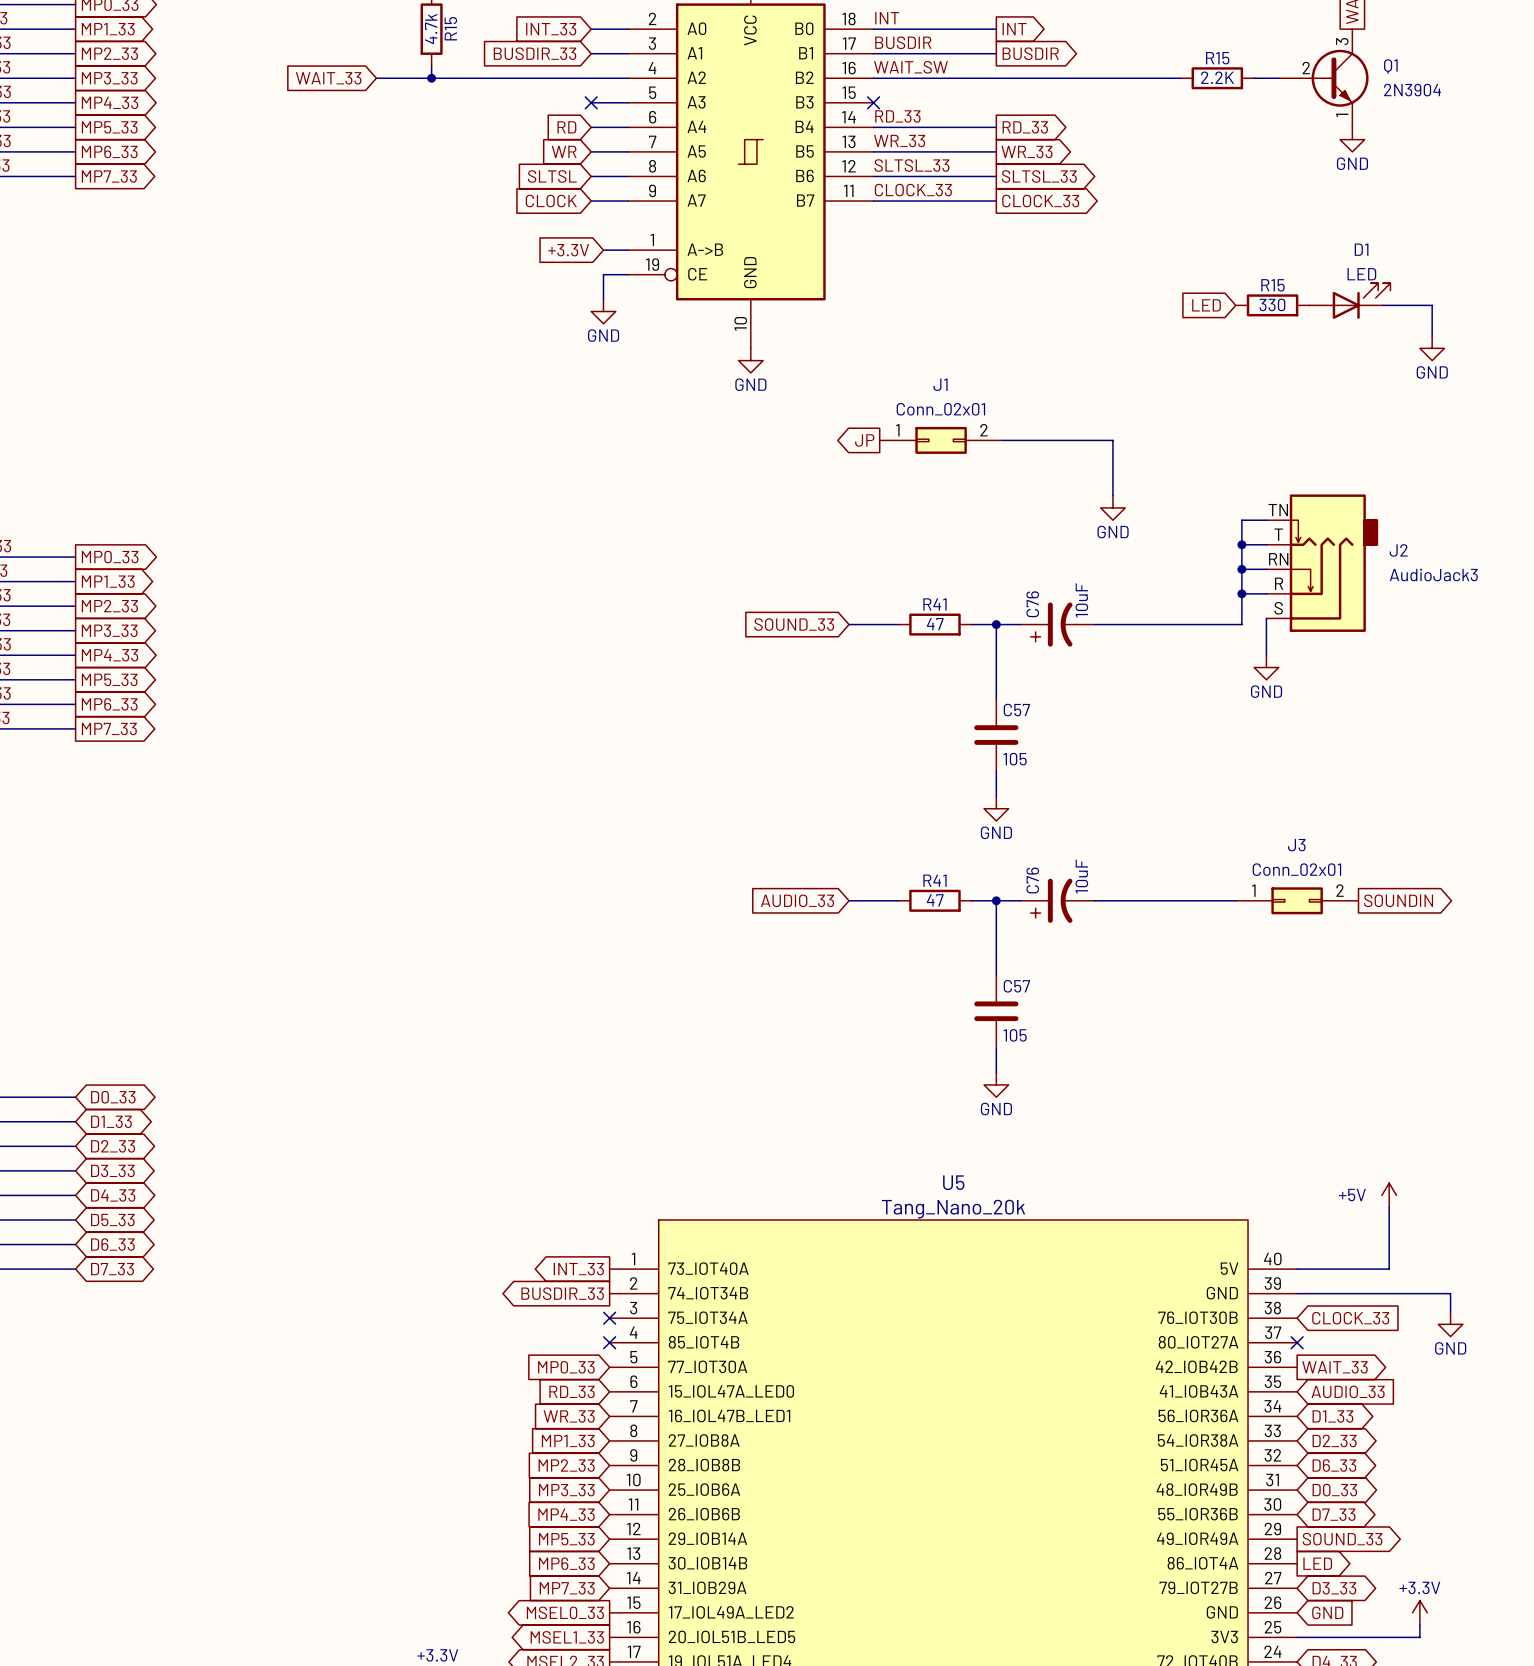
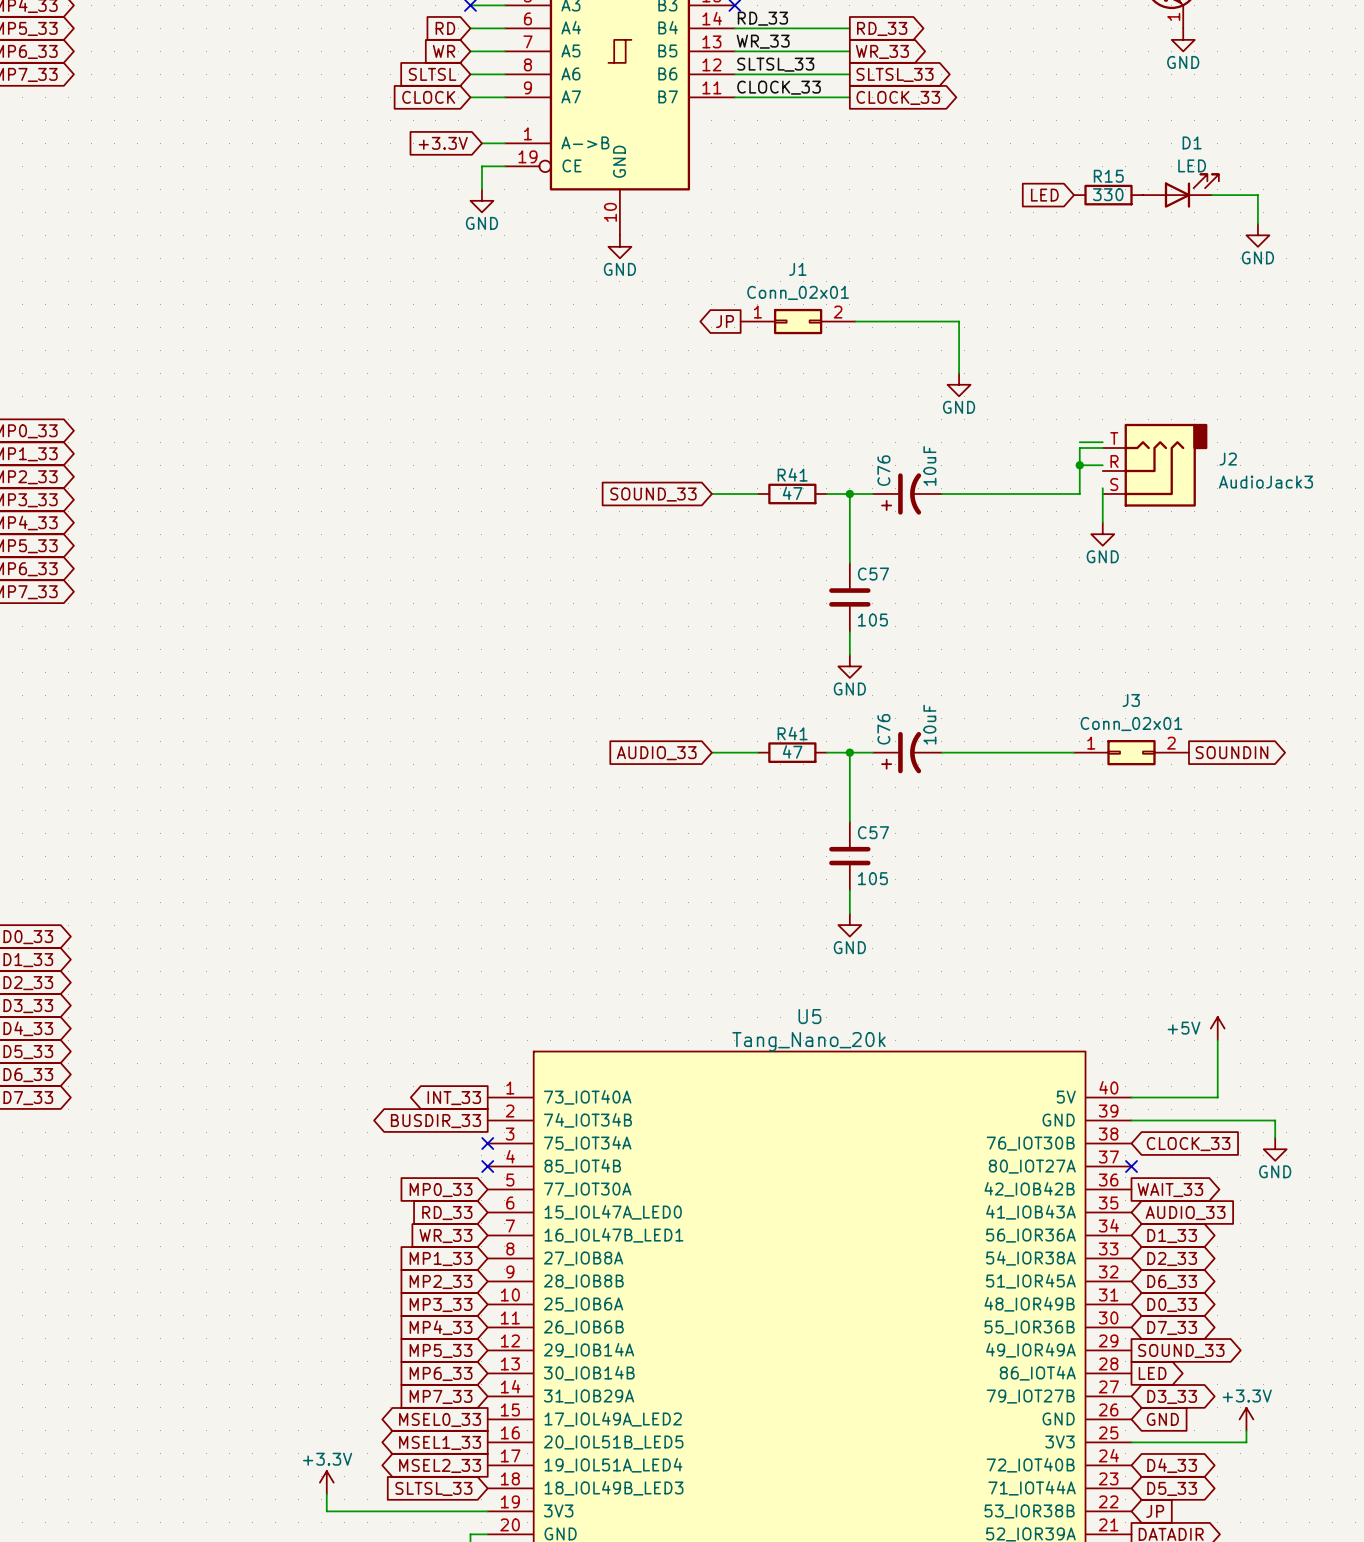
J2 symbol: [1266, 494, 1379, 632] -> [1102, 423, 1208, 507]
wire: (1266, 520) (1241, 520) (1241, 575) -> (1102, 448) (1079, 448)
wire: (1241, 544) (1266, 544) -> none
junction: (1241, 544) -> none
junction: (1241, 569) -> none

